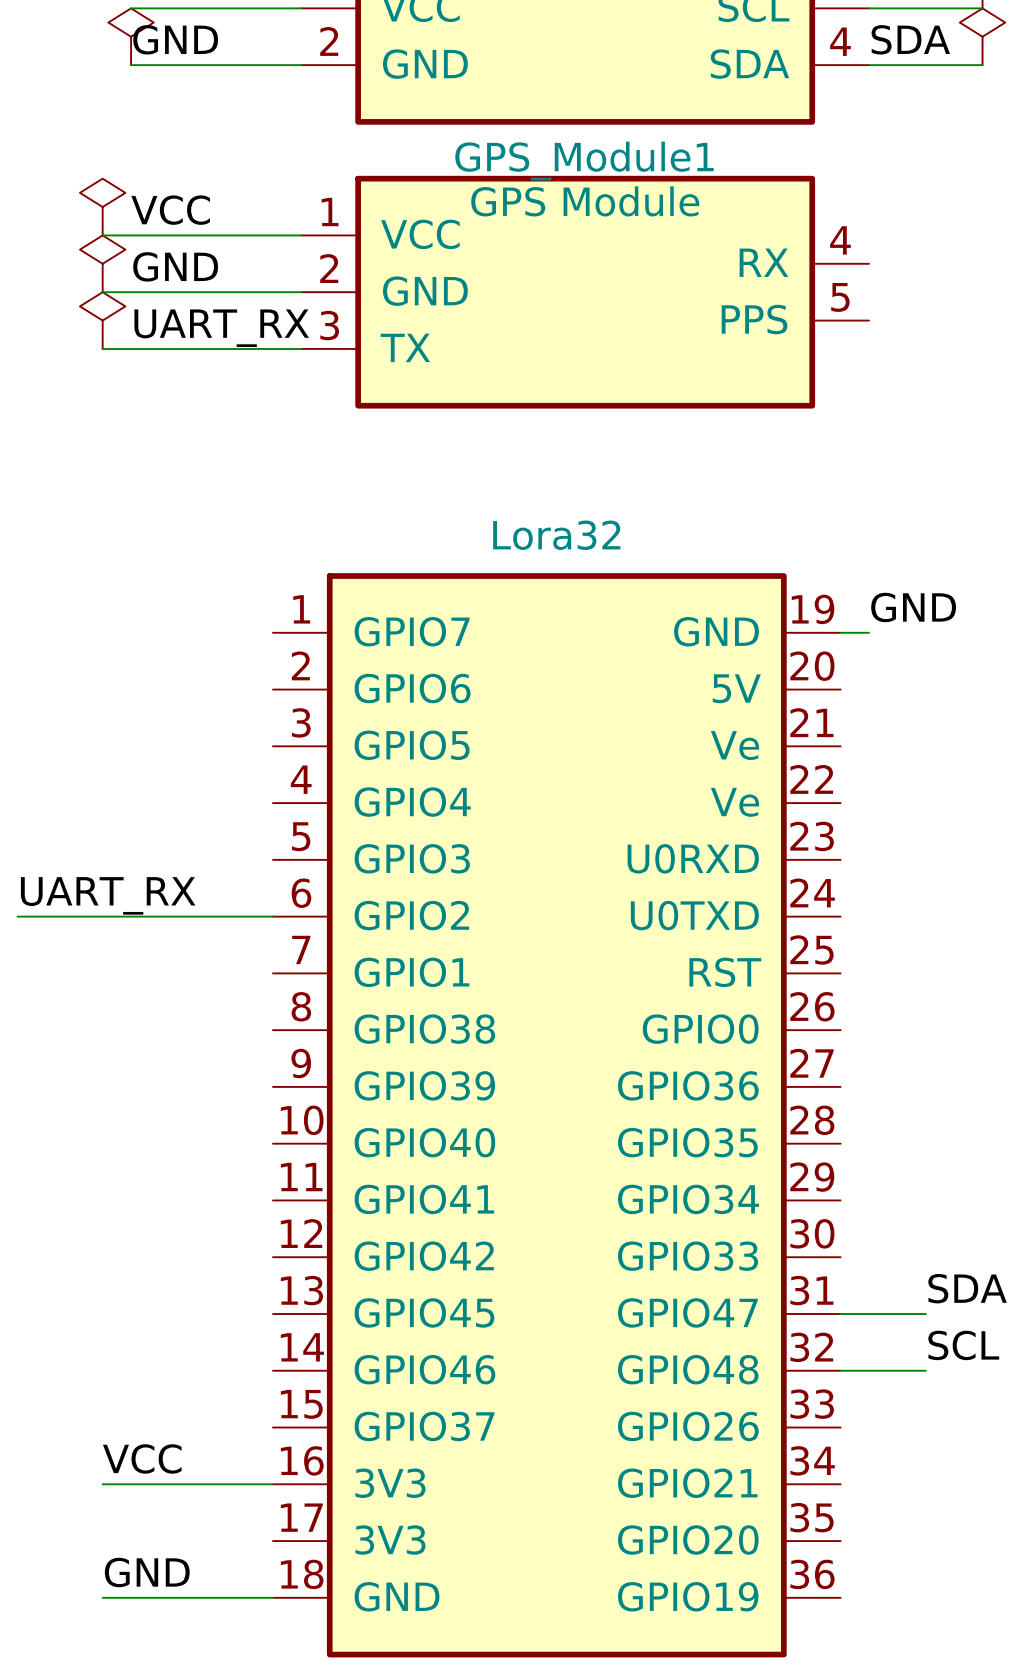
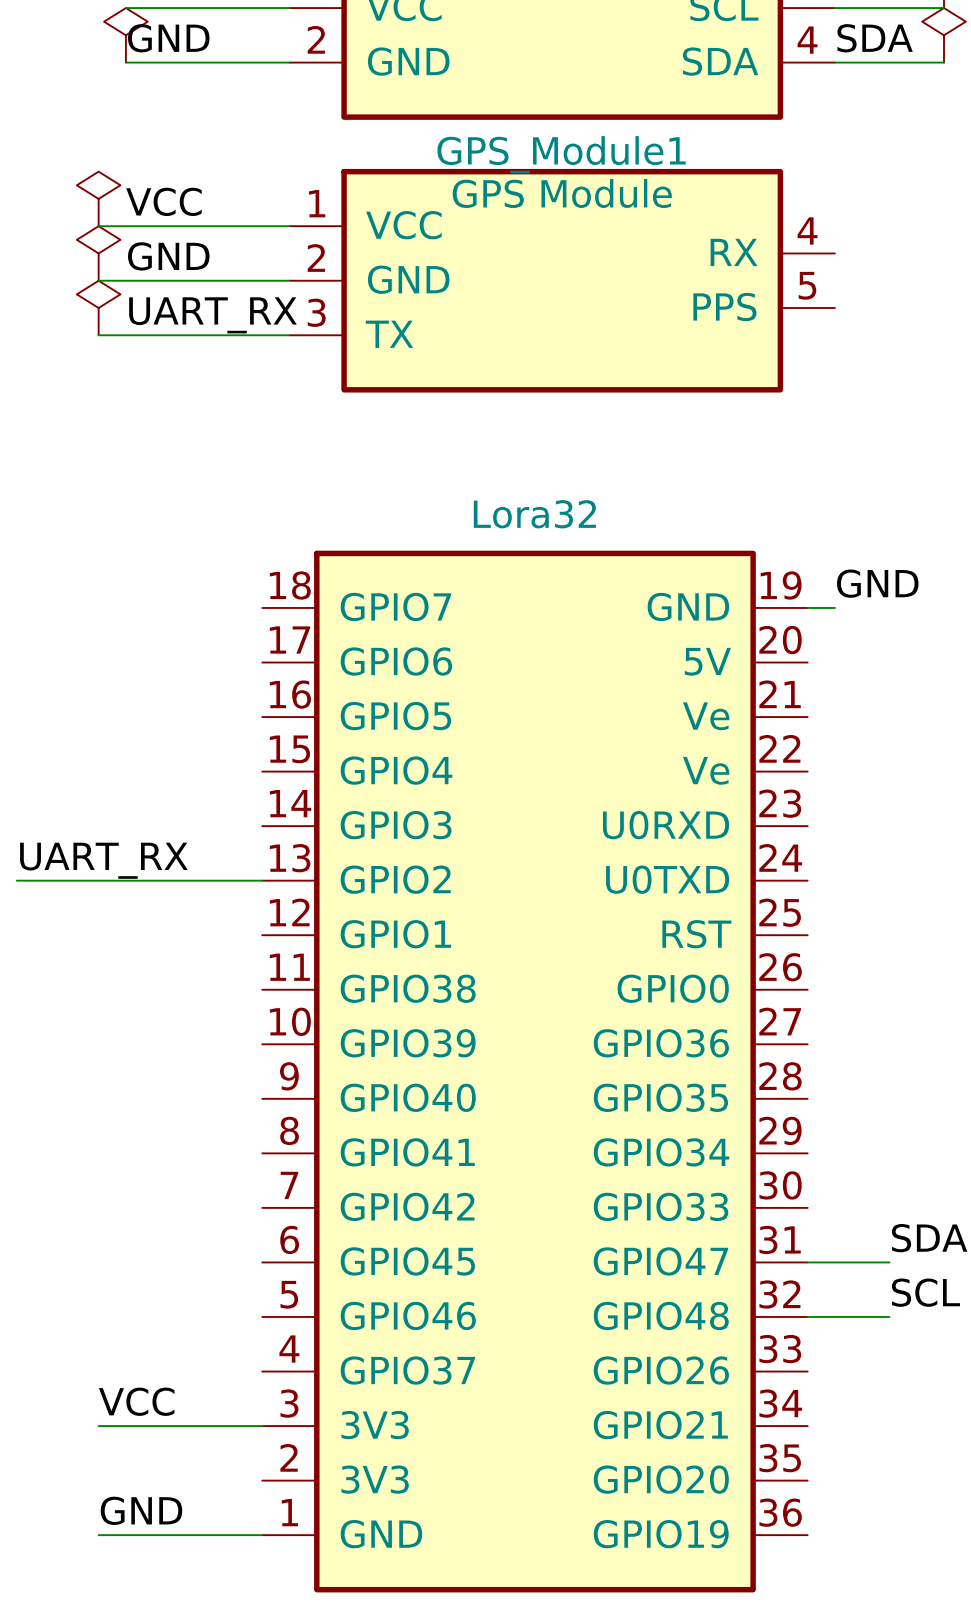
Lora32 symbol: [272, 573, 841, 1658] -> [262, 550, 808, 1593]

